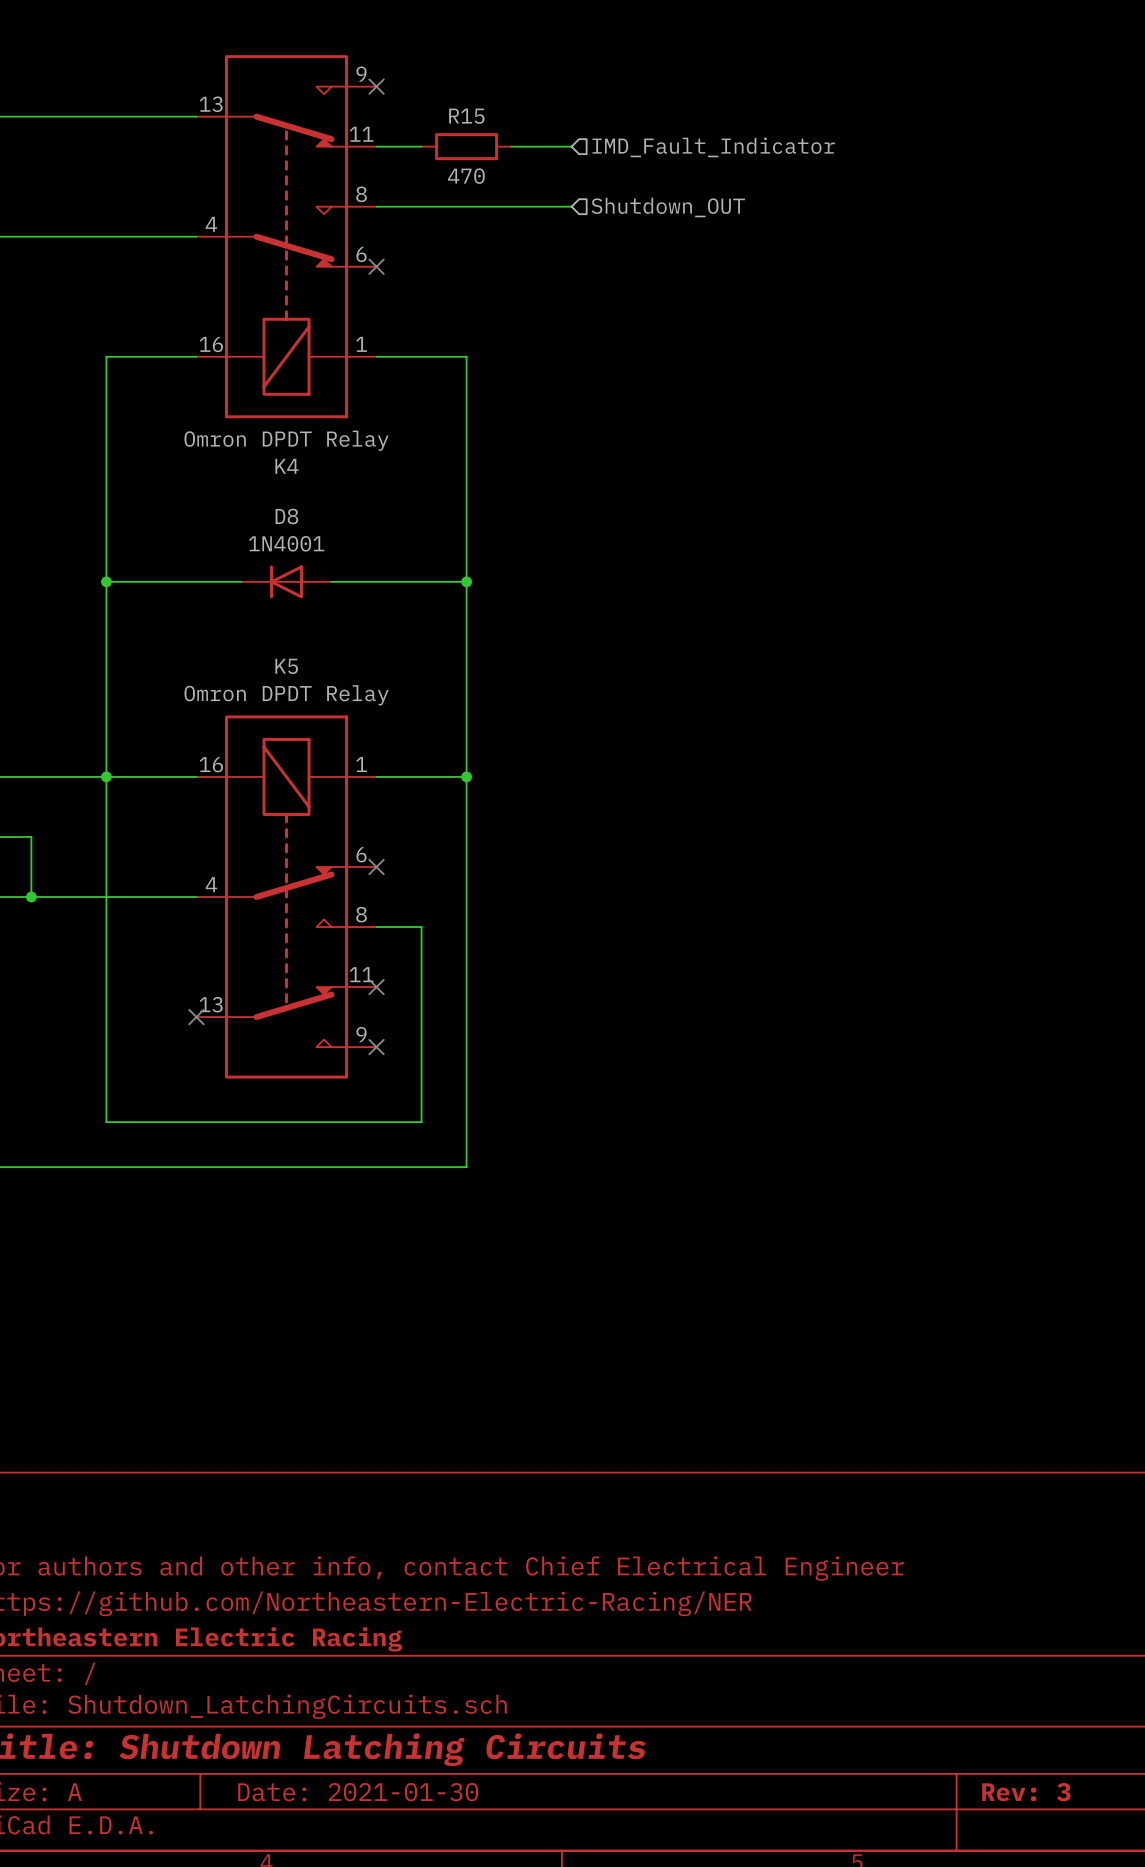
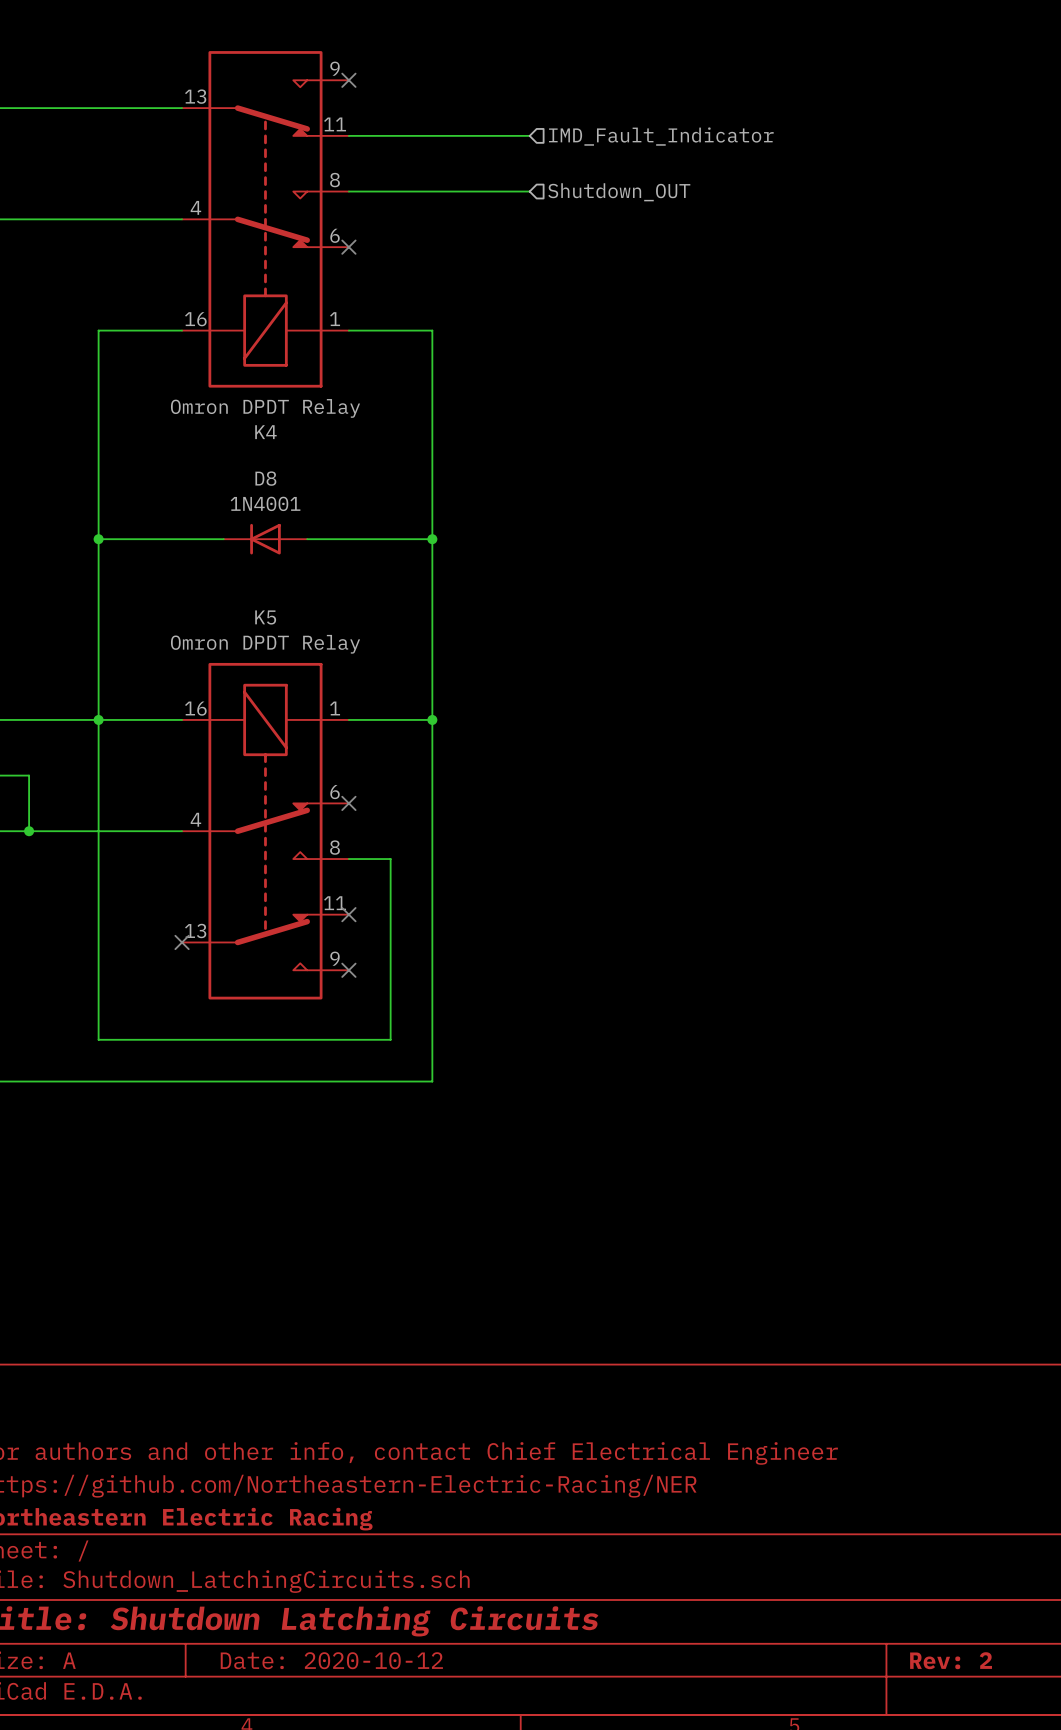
wire: none -> (390, 135) (474, 135)
R15: 470 (466, 146) -> none
title block: Date: 2021-01-30 (358, 1792) -> Date: 2020-10-12 (331, 1660)
title block: Rev: 3 (1026, 1792) -> Rev: 2 (951, 1660)

